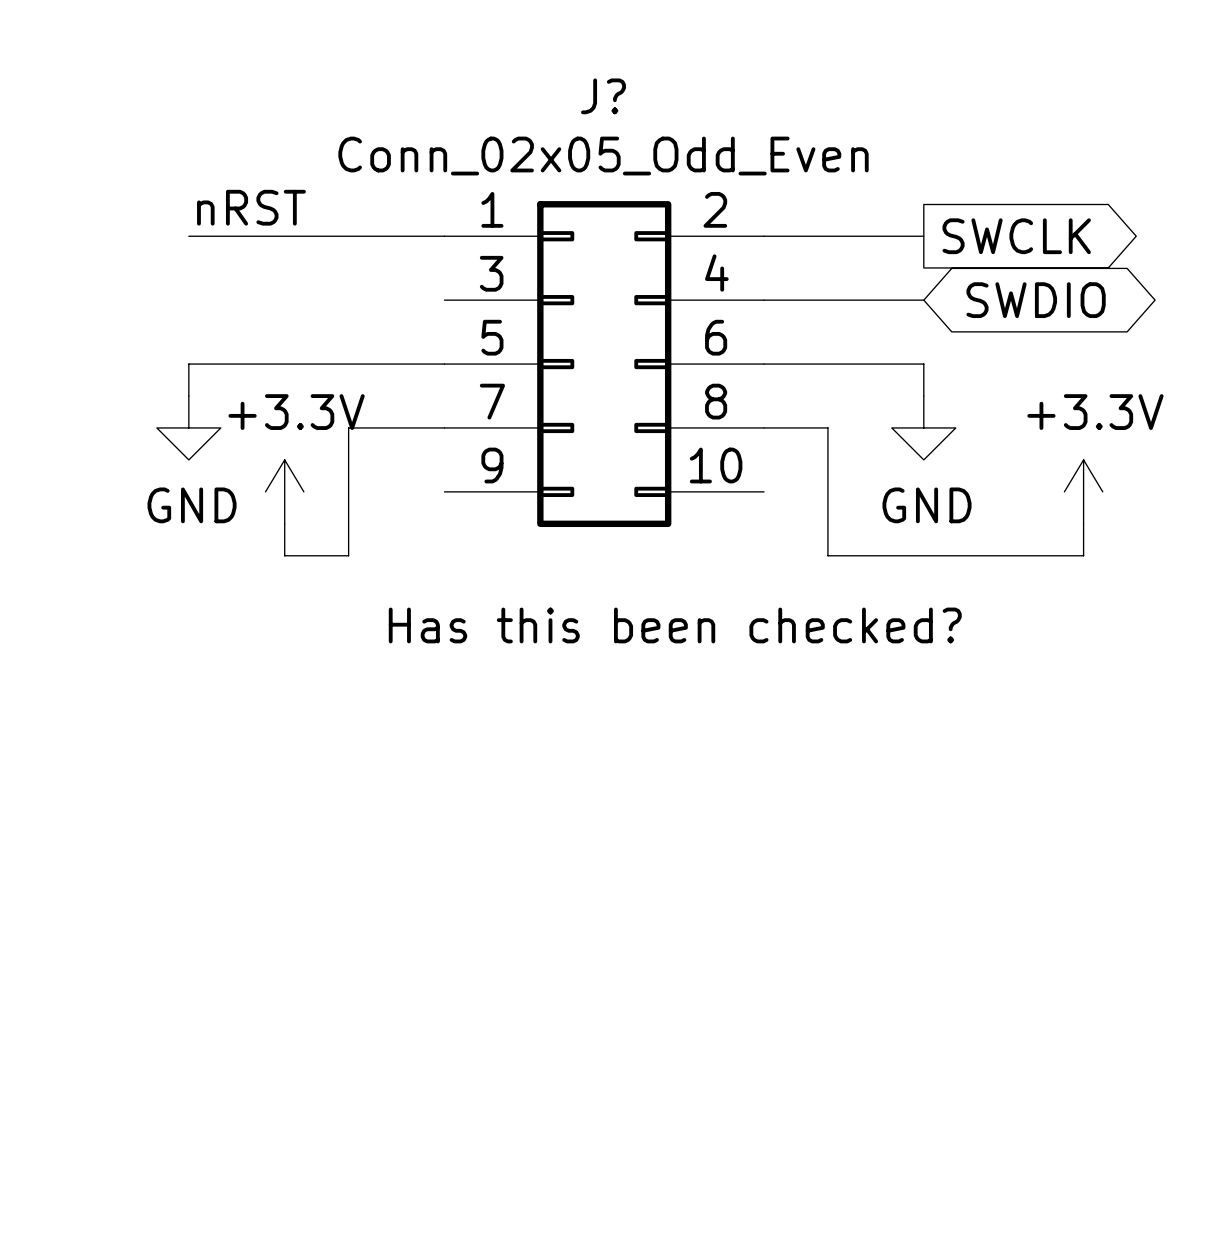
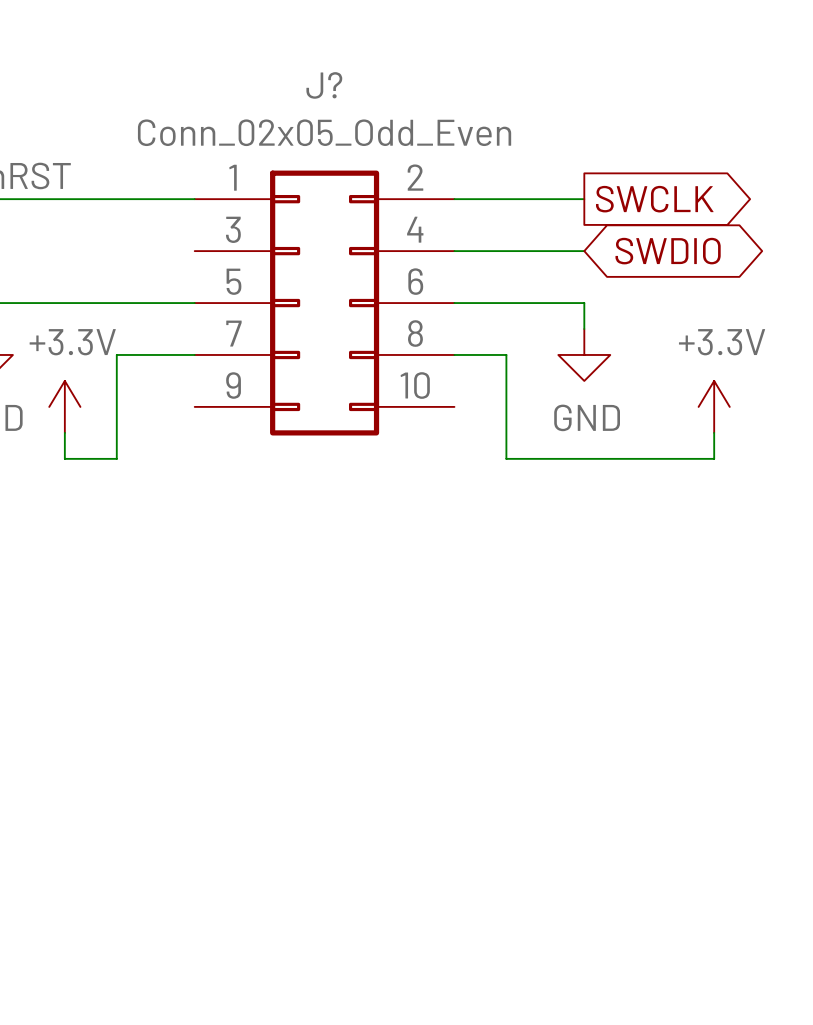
text: Has this been checked? (675, 625) -> none

